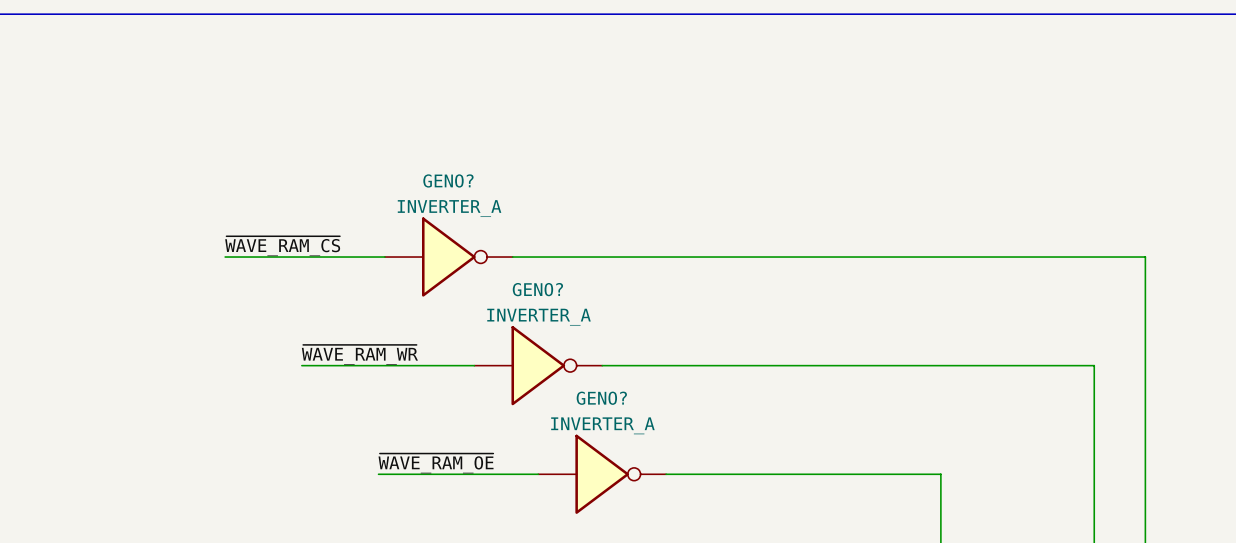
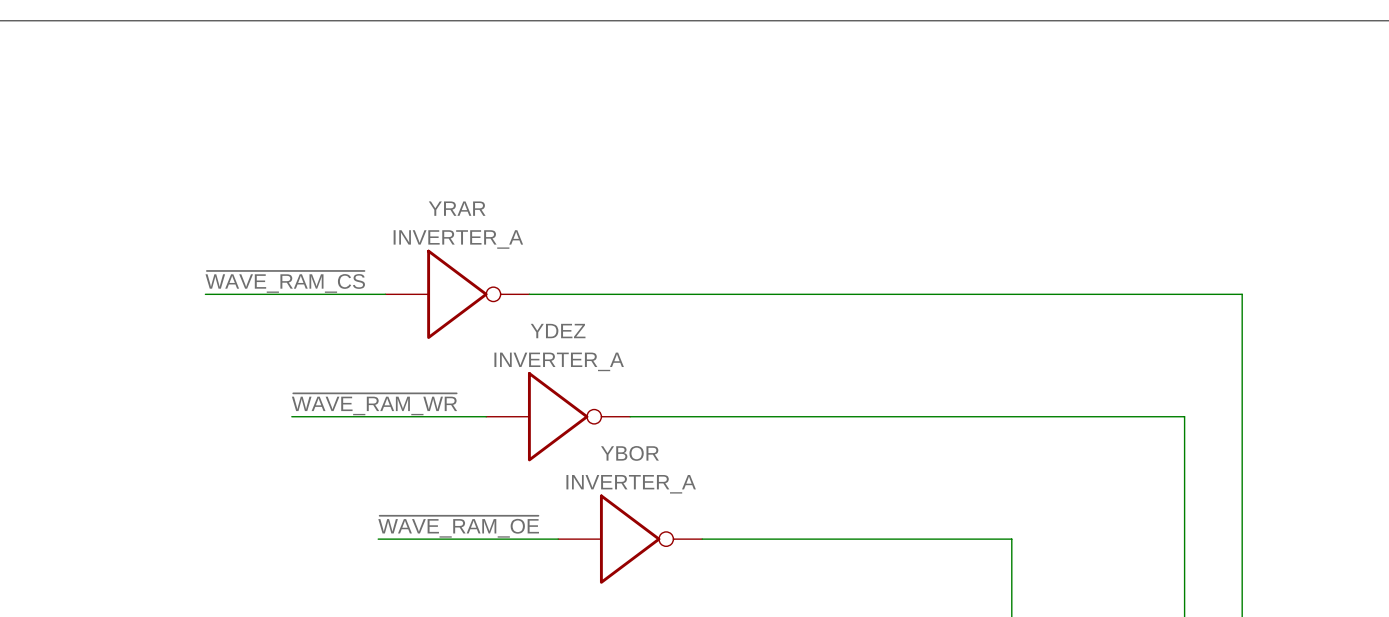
GENO? name: GENO? (448, 180) -> YRAR (457, 208)
GENO? name: GENO? (537, 289) -> YDEZ (558, 331)
GENO? name: GENO? (601, 398) -> YBOR (629, 453)

